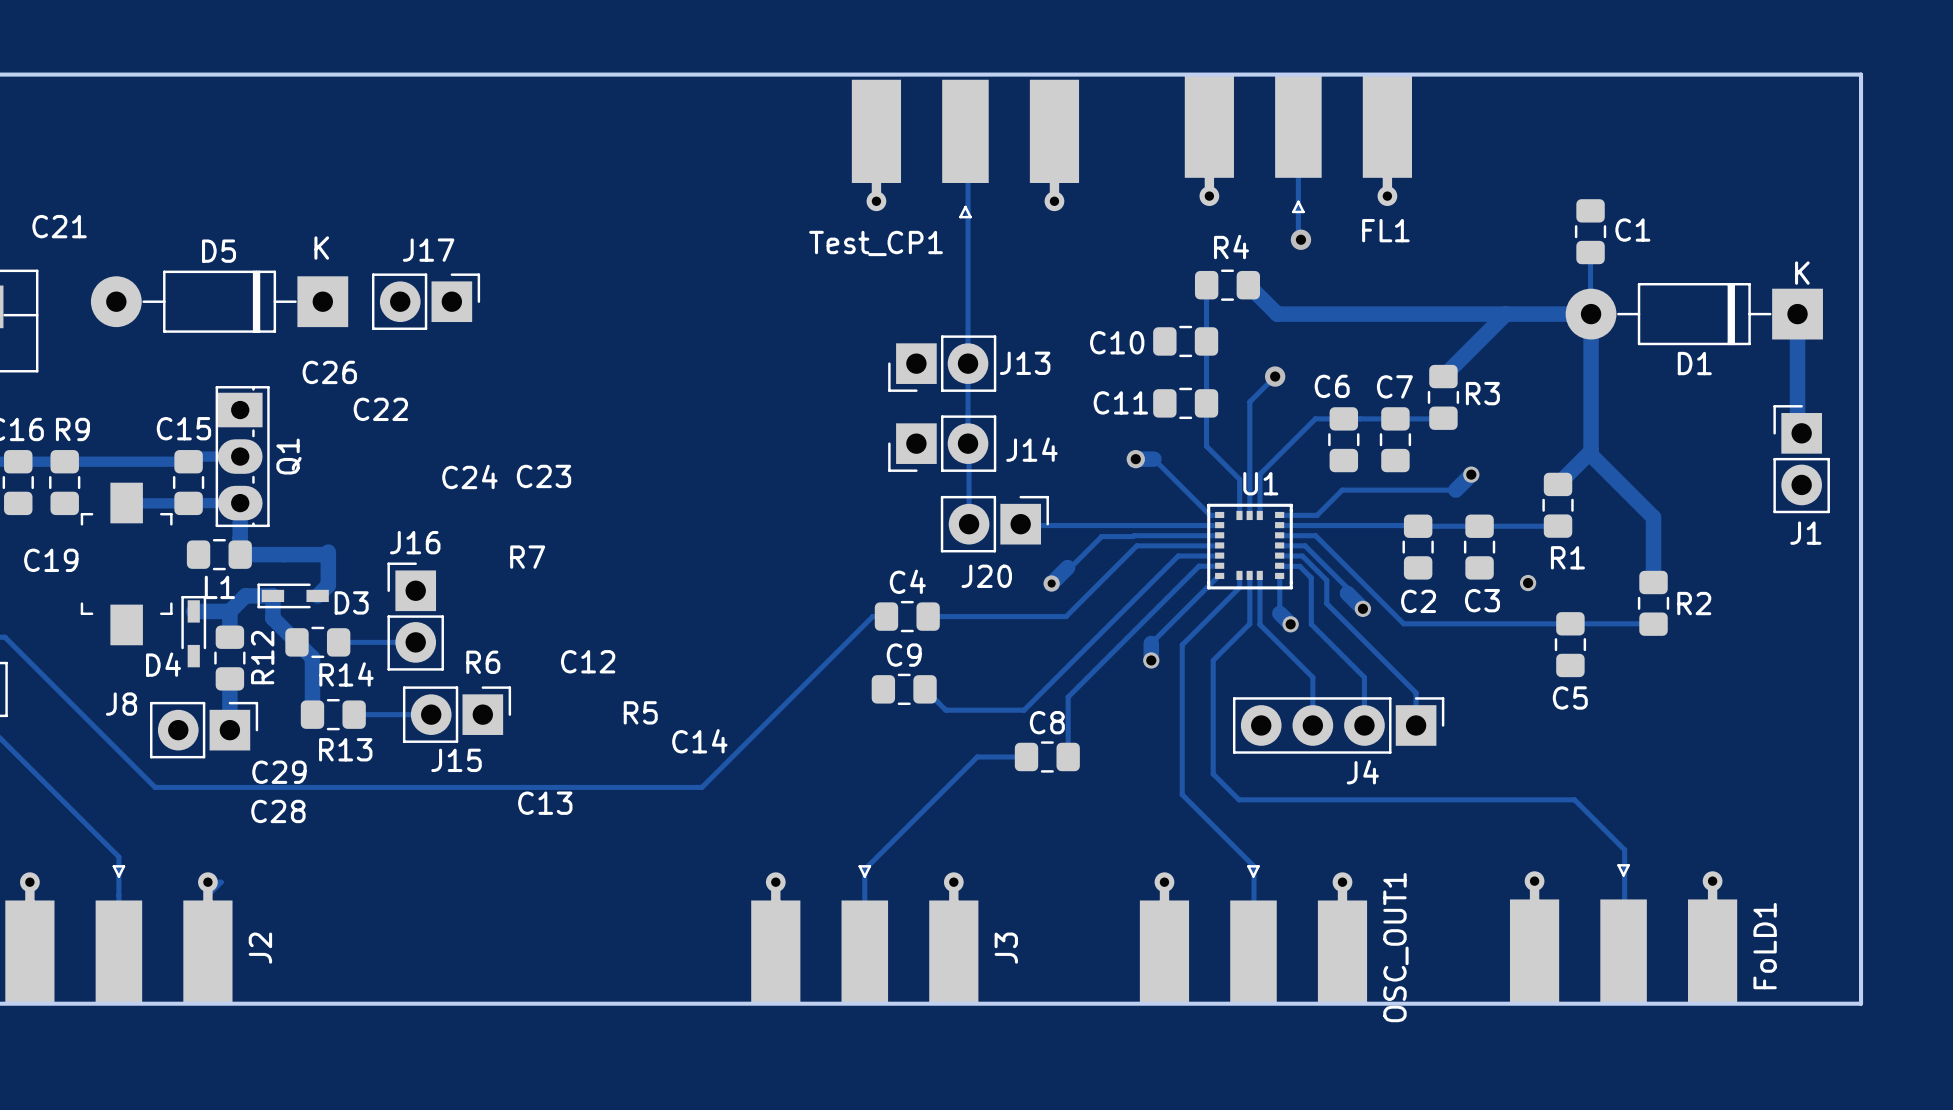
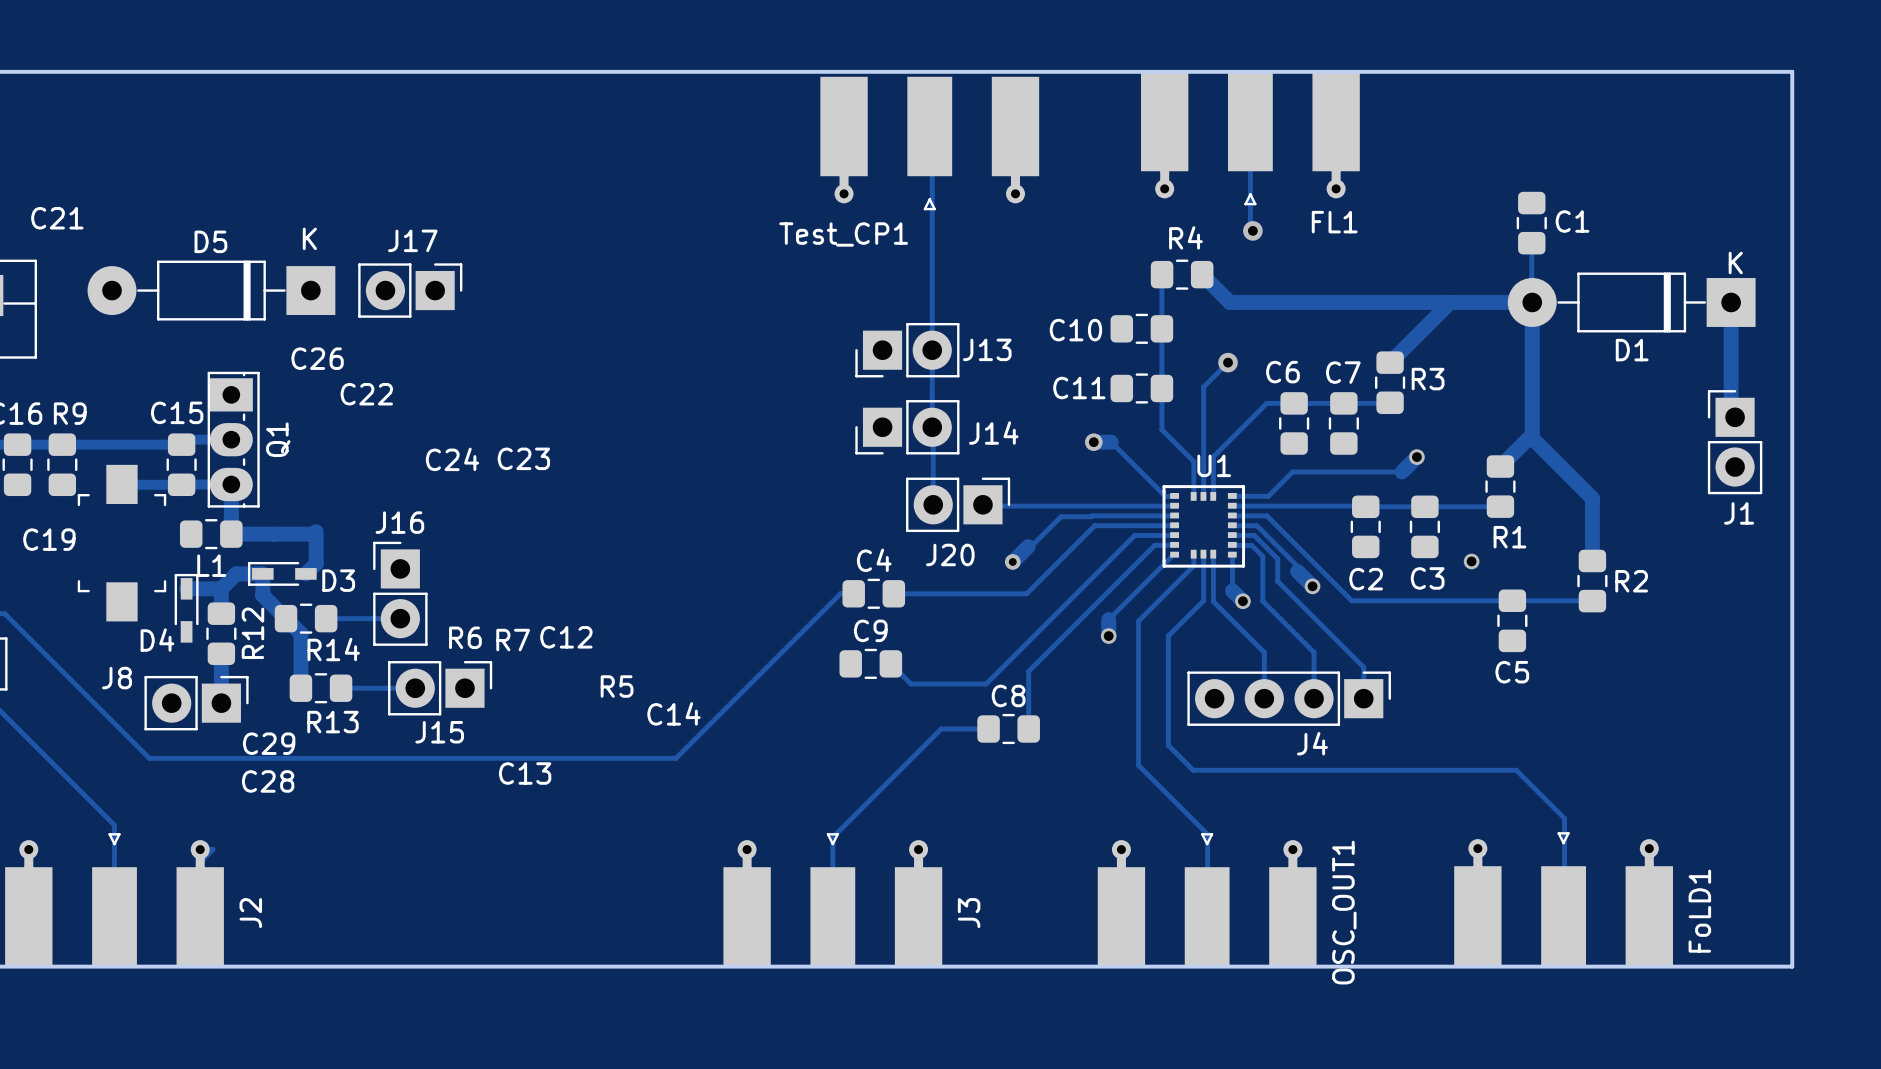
R7 position: (527, 557) -> (513, 640)

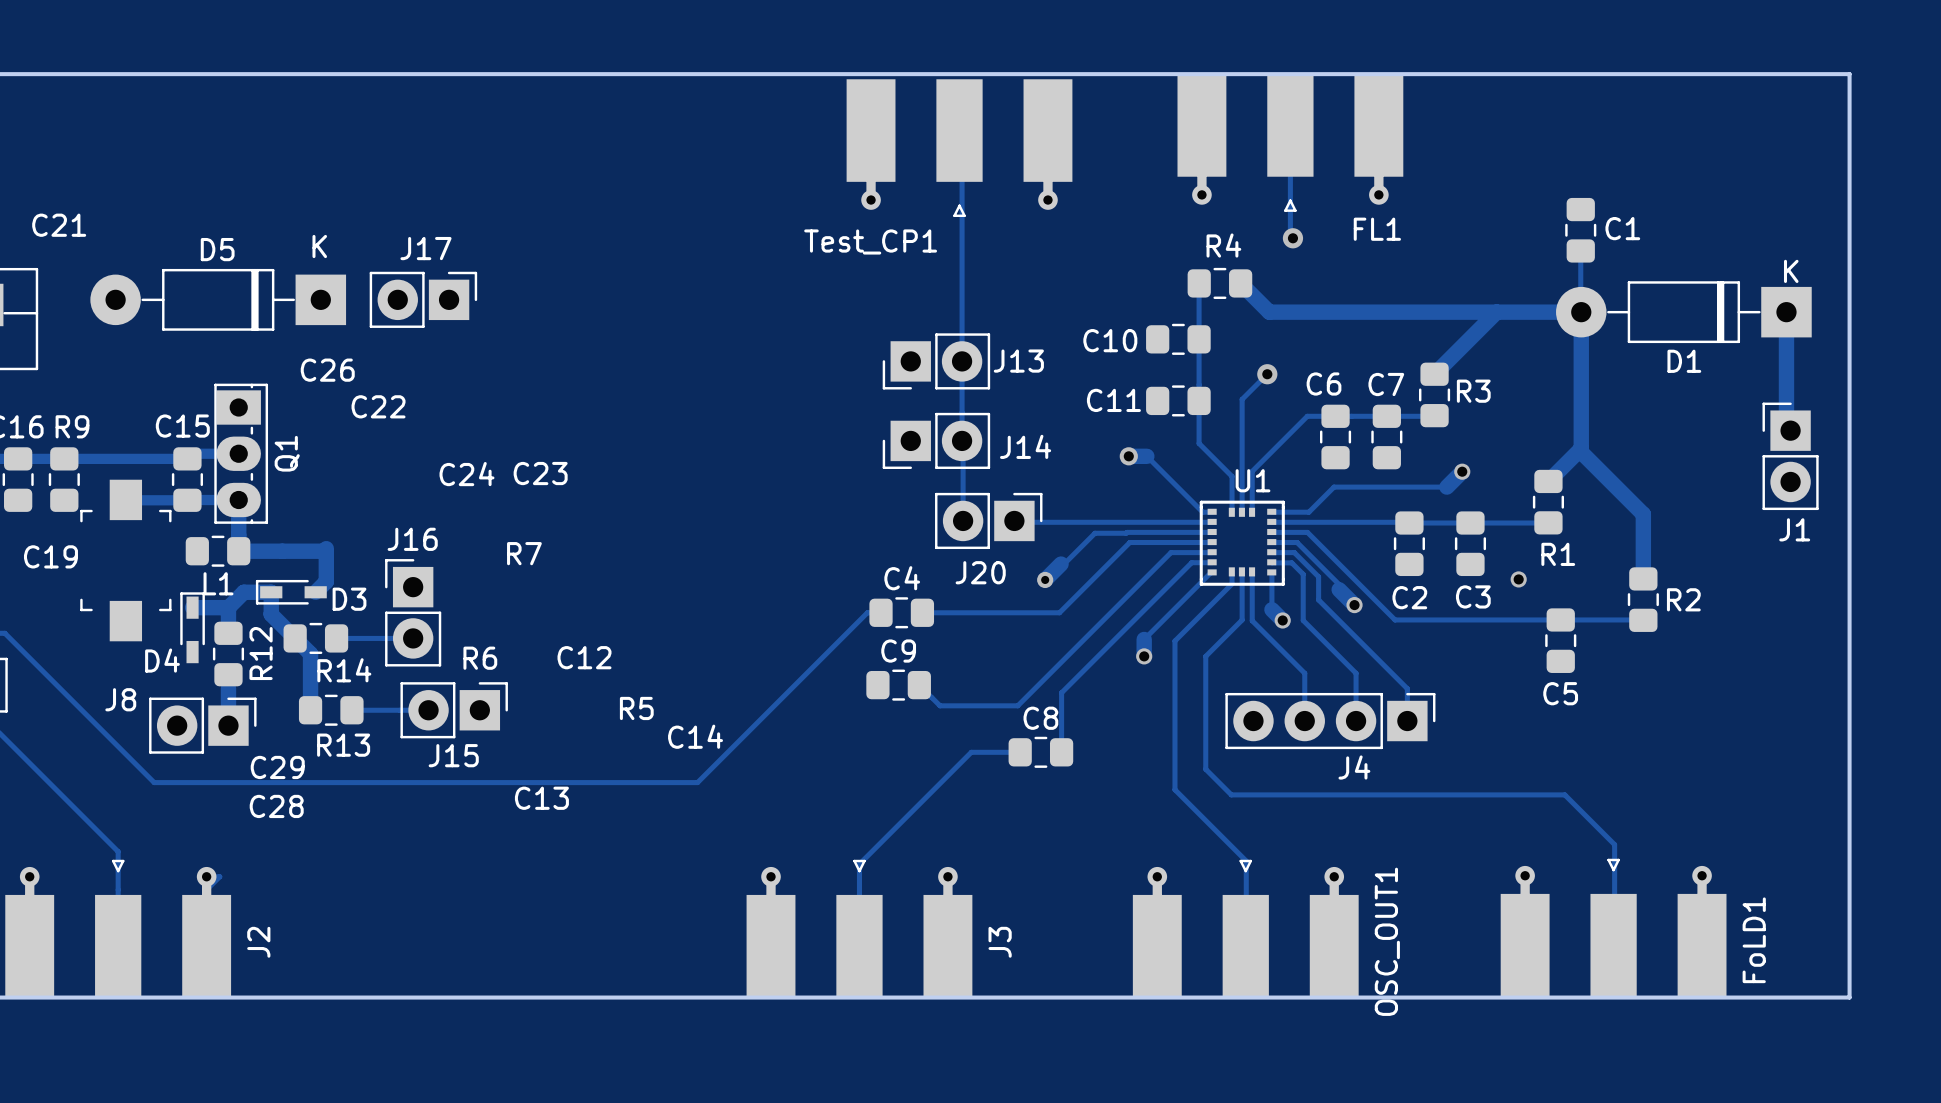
R7 position: (513, 640) -> (524, 553)

